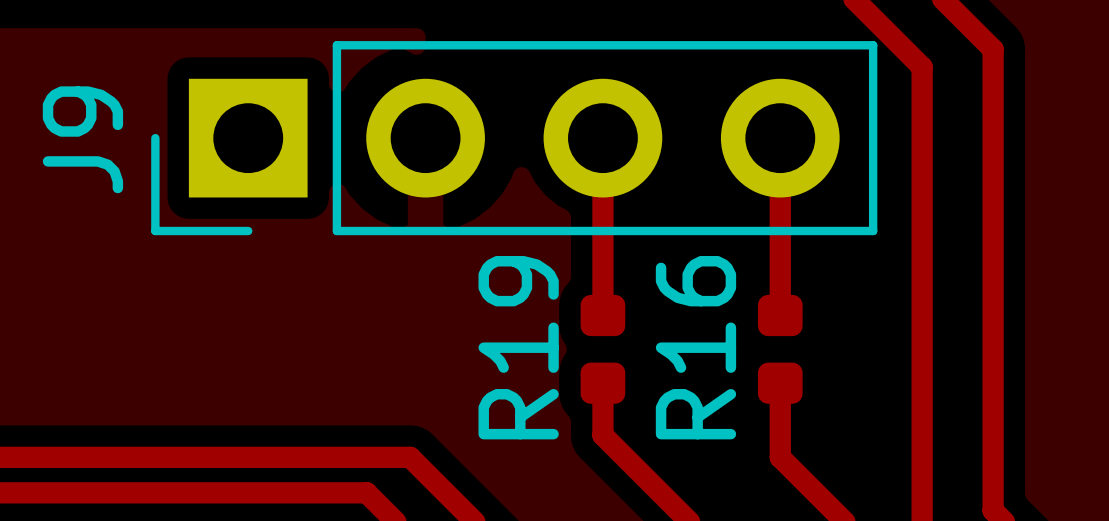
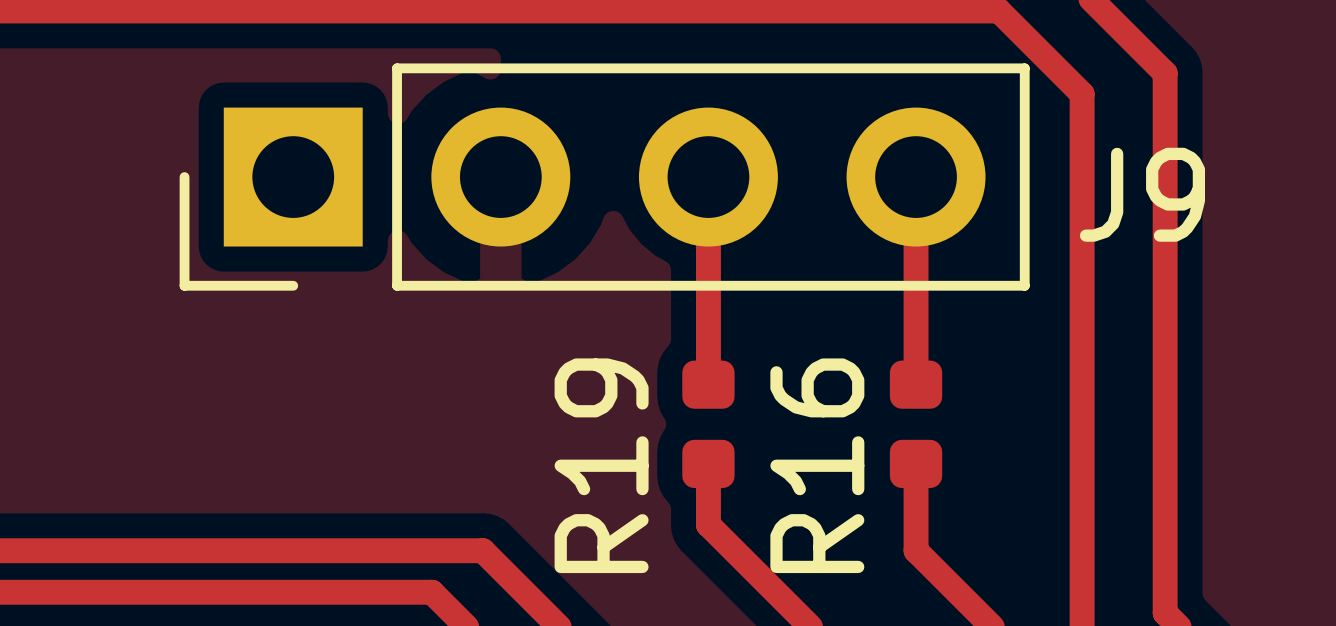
J9 name rotation: 0° (82, 139) -> 90° clockwise (1142, 194)
J9 name position: J9 (82, 139) -> J9 (1142, 194)
R19 name position: R19 (518, 347) -> R19 (601, 465)
R16 name position: R16 (695, 347) -> R16 (817, 465)

